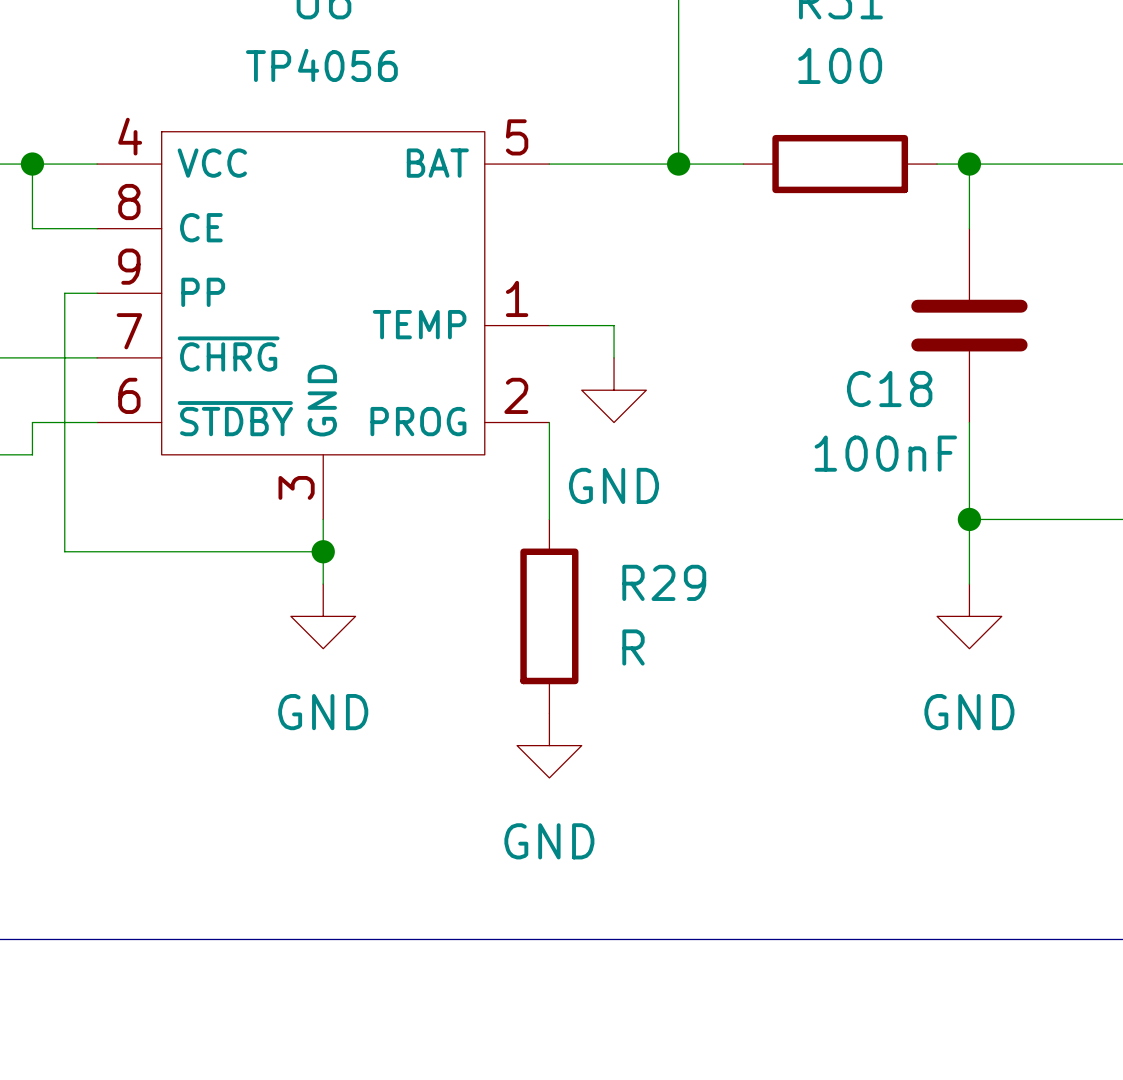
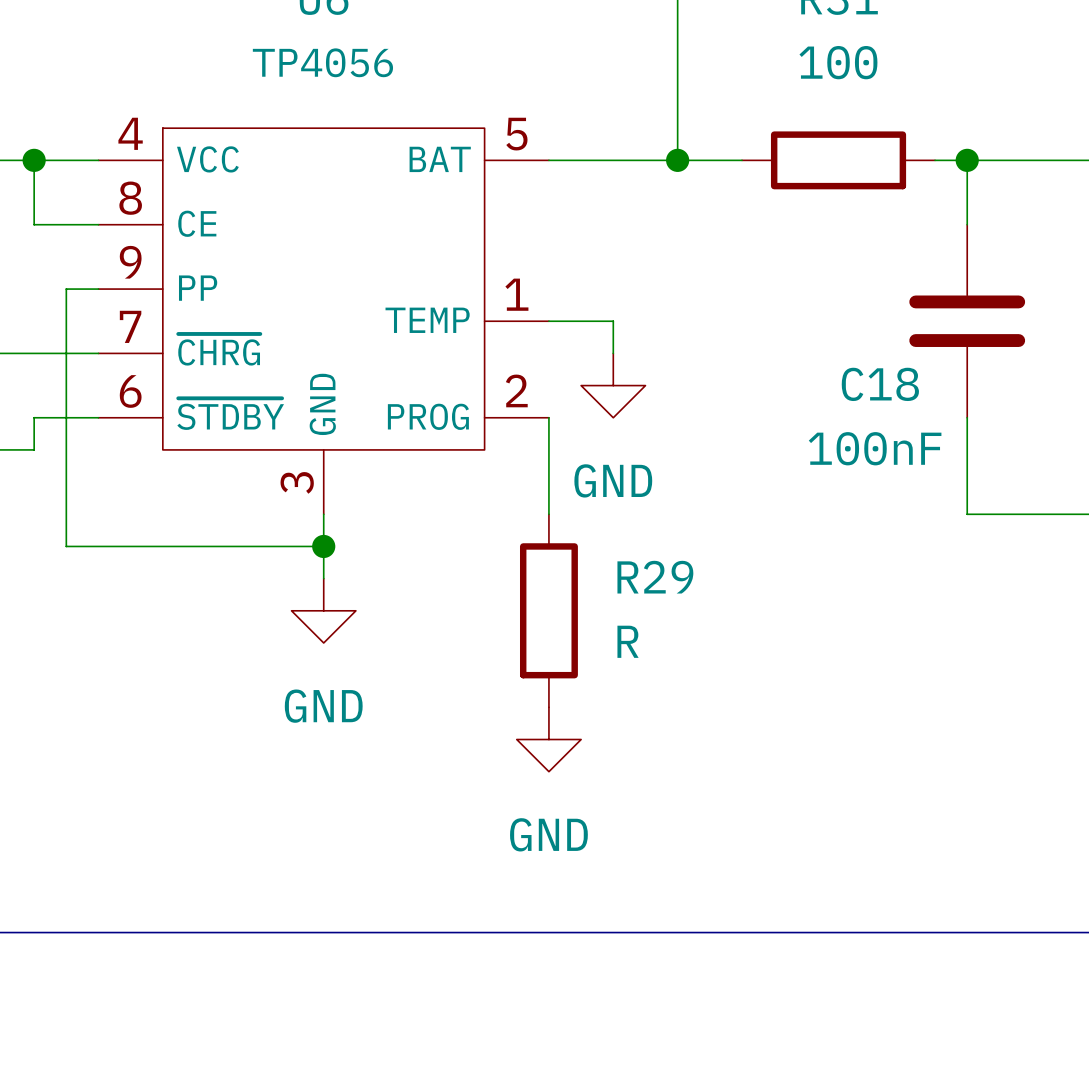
wire: (969, 519) (969, 584) -> none
junction: (969, 519) -> none
power symbol: GND (969, 616) -> none

